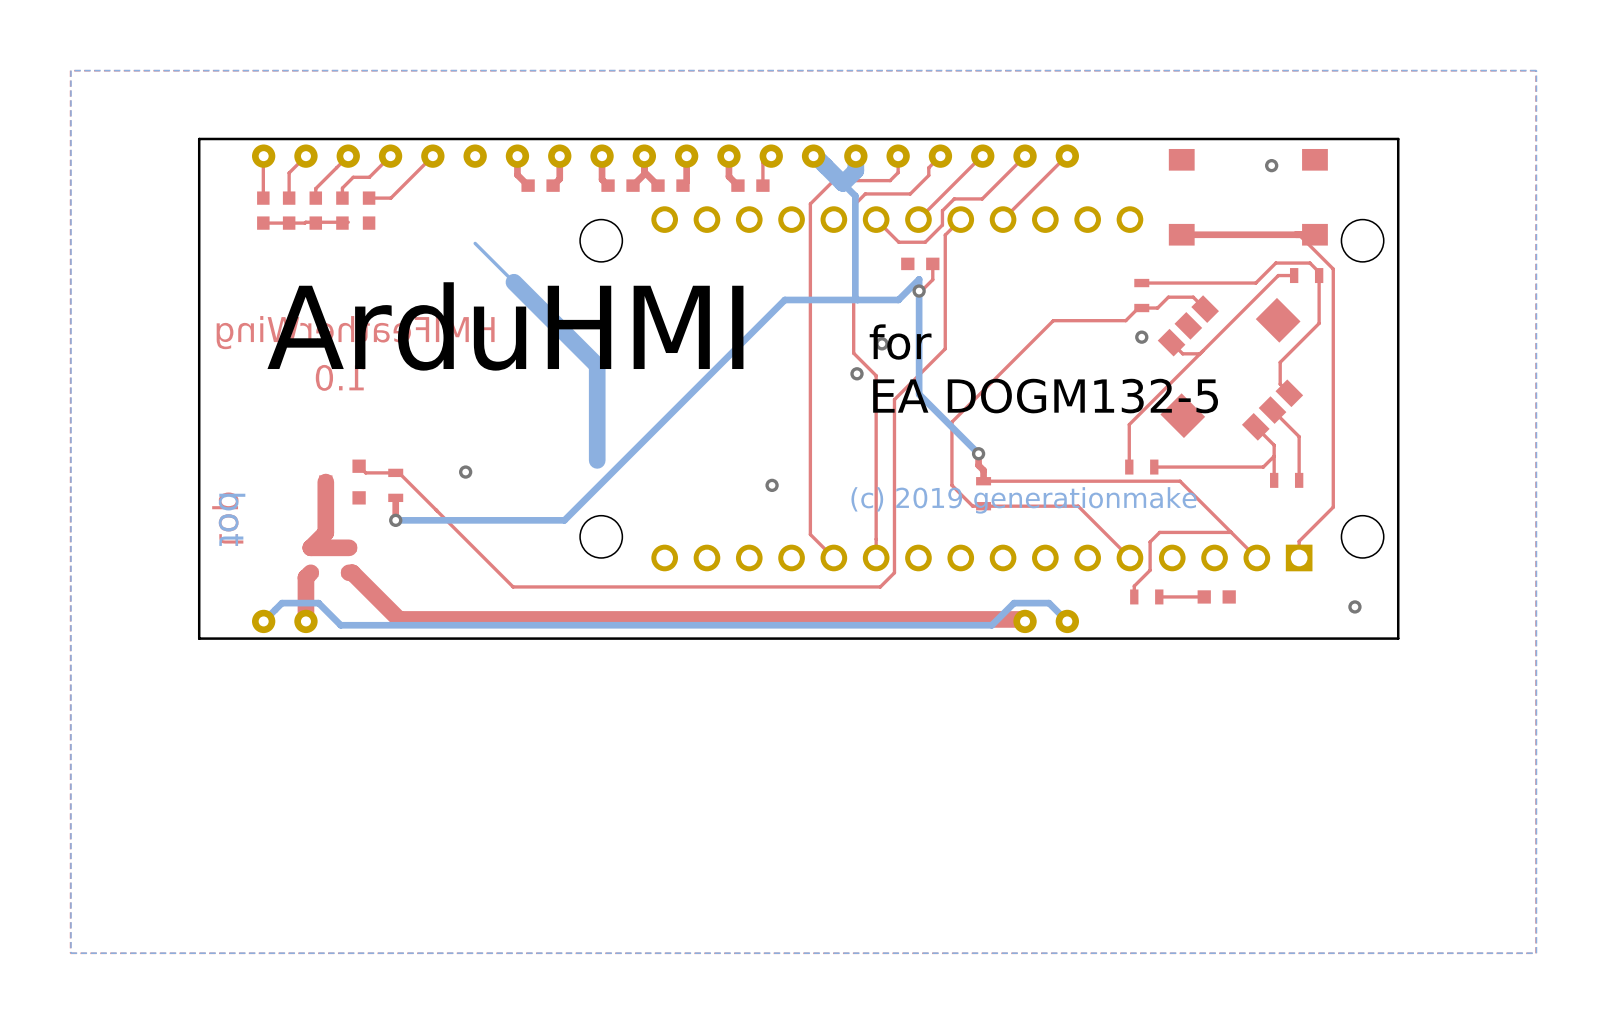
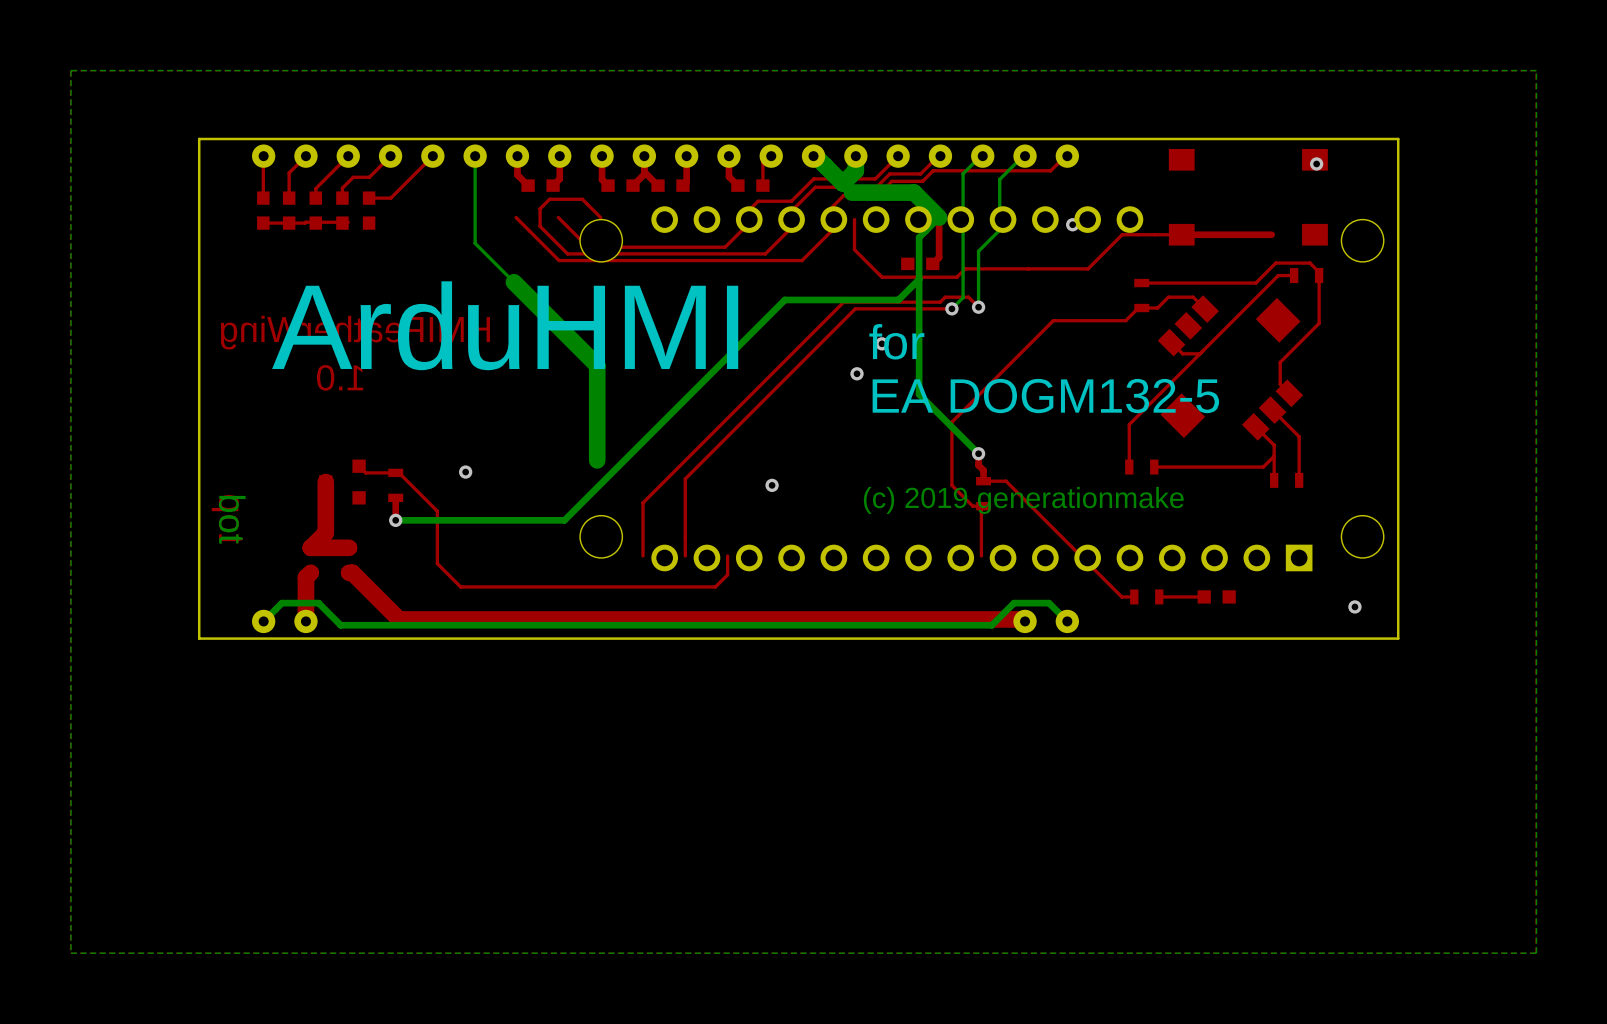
bottom track: none -> (475, 154) (475, 243)
top track: none -> (940, 154) (920, 173) (889, 173) (876, 187) (815, 187) (792, 210) (792, 227) (765, 253) (567, 253) (540, 226) (540, 208) (549, 199) (582, 199) (600, 217)
bottom track: none -> (982, 154) (963, 173) (963, 297) (951, 308)
bottom track: none -> (1025, 154) (999, 179) (999, 230) (978, 251) (978, 307)
top track: none -> (1067, 154) (1050, 170) (933, 170) (922, 181) (891, 181) (877, 195) (843, 195) (830, 208) (830, 232) (802, 260) (559, 260) (516, 217)
top track: (898, 156) (898, 172) (890, 180) (833, 180) (810, 203) (810, 534) (833, 557) -> (898, 156) (875, 178) (813, 178) (791, 201) (758, 201) (745, 213) (745, 226) (725, 247) (588, 247) (558, 217)
top track: (940, 156) (928, 167) (928, 175) (910, 193) (865, 193) (853, 205) (853, 353) (876, 375) (876, 557) -> none
top track: (982, 156) (918, 219) -> none
top track: (1025, 156) (982, 198) (954, 198) (942, 210) (942, 225) (925, 242) (898, 242) (876, 219) -> none
top track: (1067, 156) (1003, 219) -> none
via position: (1271, 165) -> (1316, 163)
bottom track: (852, 192) (855, 195) (855, 297) (857, 299) -> (852, 192) (914, 192) (939, 217) (919, 237) (919, 279)
top track: none -> (854, 219) (854, 249) (881, 277) (956, 277) (965, 268) (1088, 268) (1122, 234) (1181, 234)
top track: (960, 219) (945, 235) (945, 348) (894, 399) (894, 572) (880, 586) (715, 586) -> (727, 555) (727, 574) (715, 586)
via: none -> (1072, 224)
top track: (1295, 234) (1298, 234) (1333, 269) (1333, 507) (1299, 541) (1299, 557) -> none
top track: (1314, 234) (1271, 234) -> none
top track: (932, 263) (932, 279) (919, 291) -> (932, 263) (939, 257) (939, 217)
via: (919, 291) -> none
top track: none -> (978, 307) (968, 297) (945, 297) (940, 302) (843, 302) (643, 502) (643, 555)
via: none -> (978, 307)
top track: none -> (951, 308) (855, 308) (685, 478) (685, 555)
via: none -> (951, 308)
via: (1141, 337) -> none
top track: (1006, 481) (1180, 481) (1256, 557) -> (1006, 481) (1121, 596) (1134, 596)
top track: (983, 506) (1078, 506) (1129, 557) -> none
top track: none -> (981, 508) (981, 555)
top track: (437, 511) (513, 586) -> (437, 511) (437, 563) (460, 586) (513, 586)
top track: (1231, 532) (1159, 532) (1150, 541) (1150, 570) (1134, 586) (1134, 596) -> none

